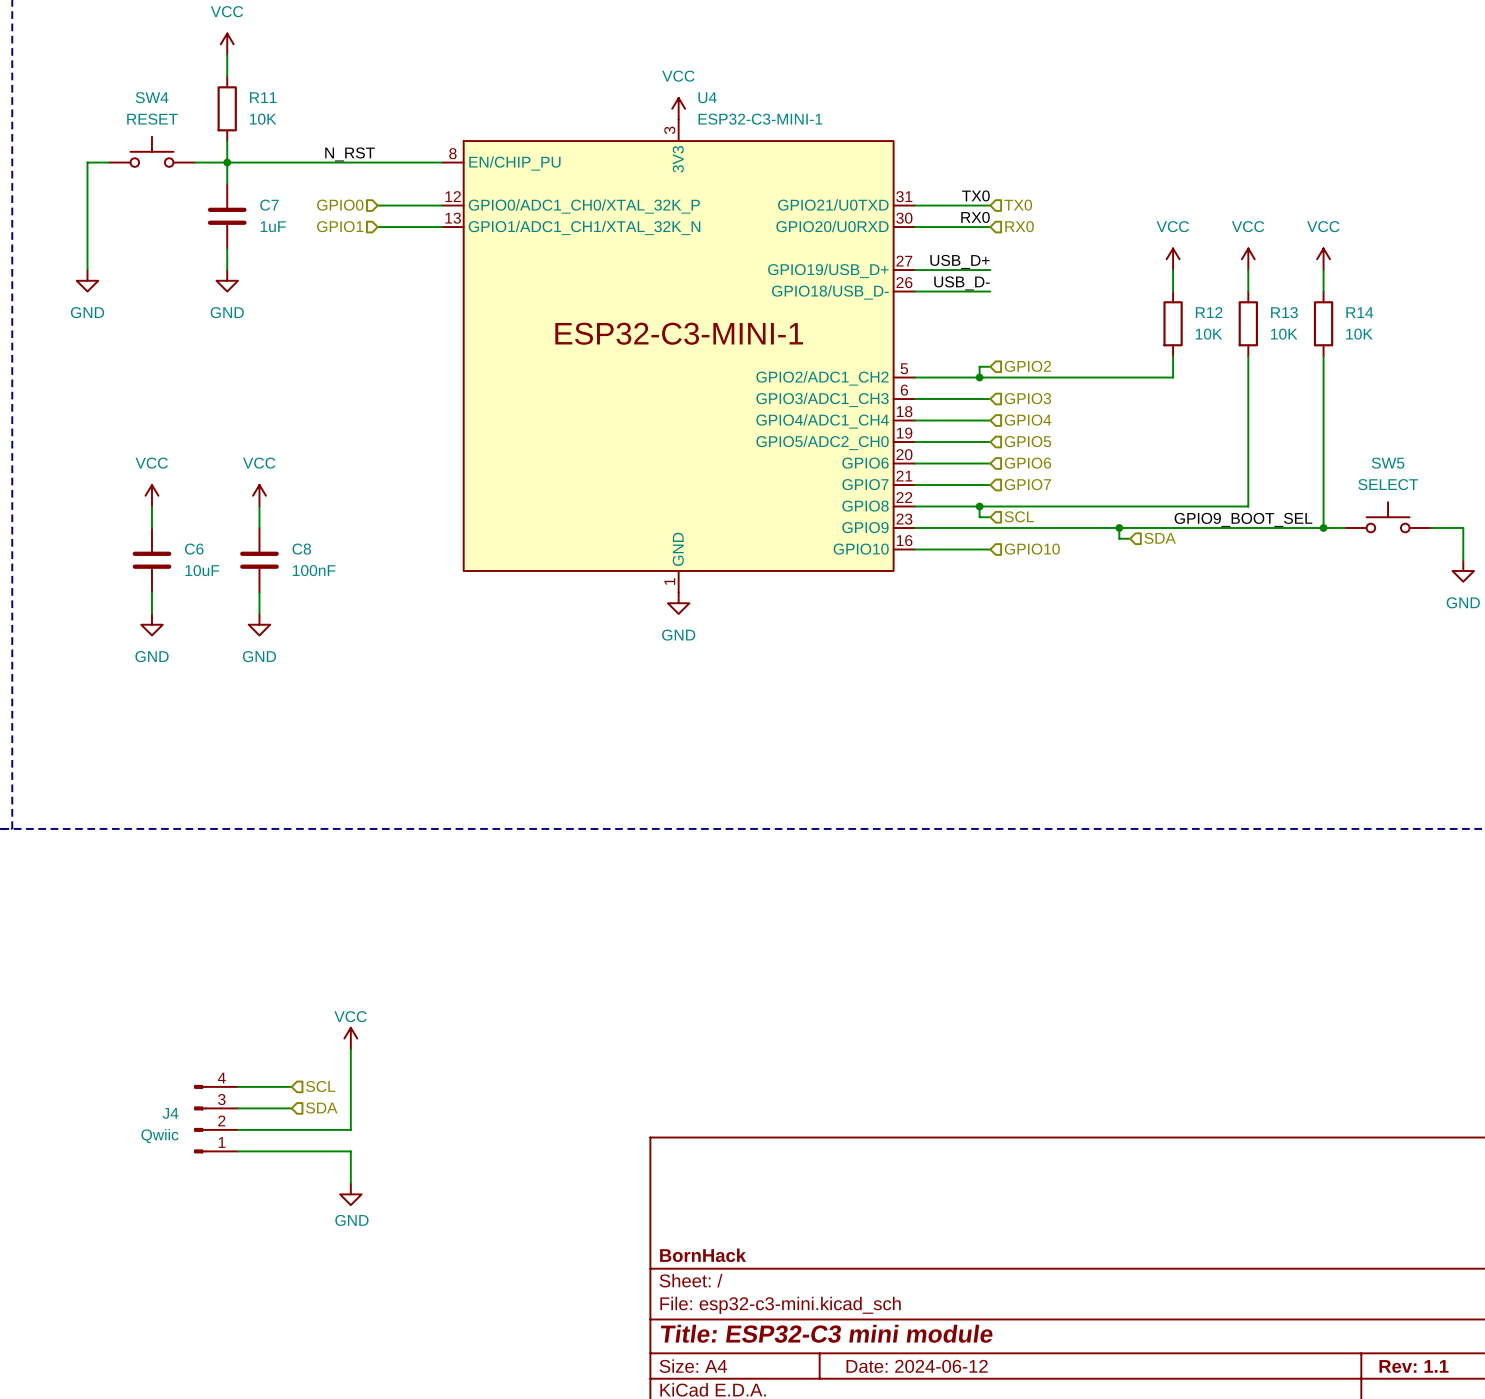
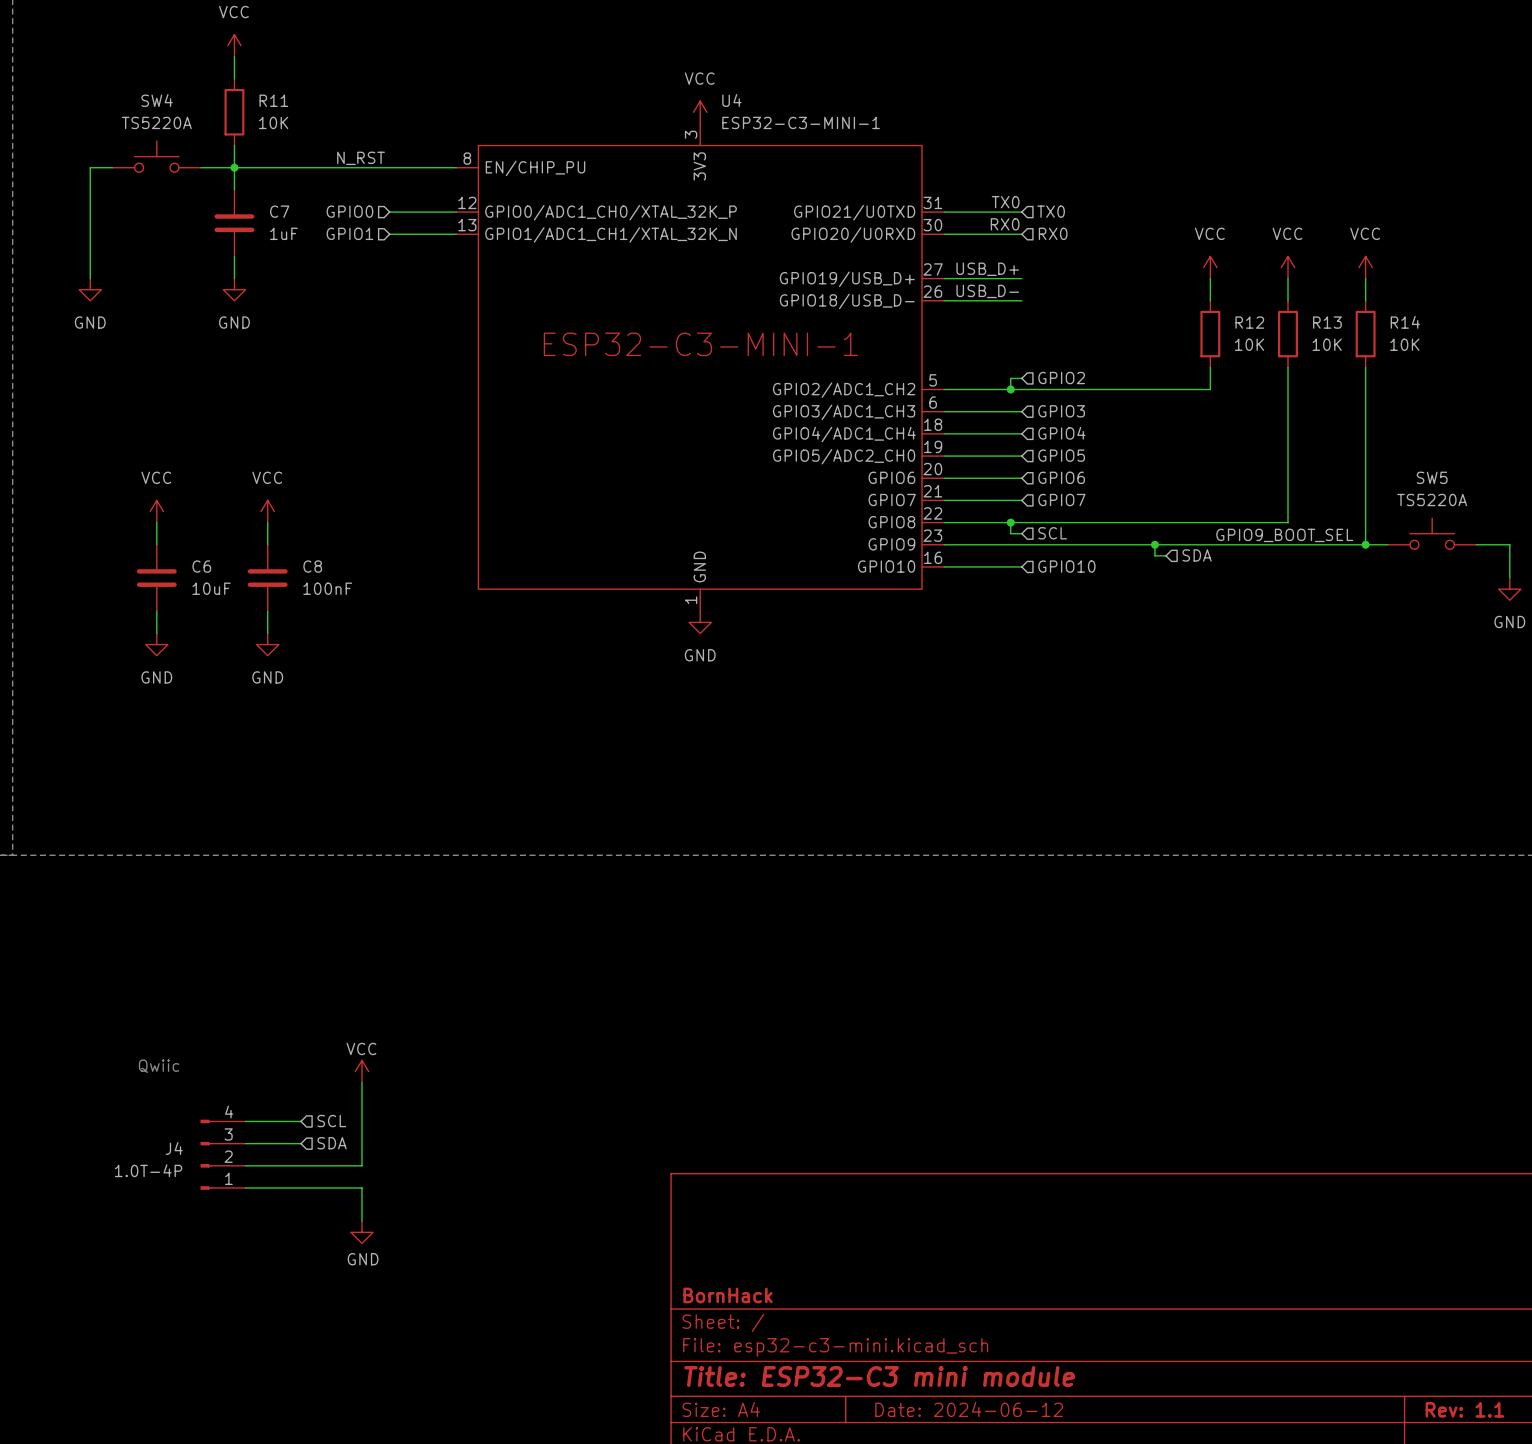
SW4 value: RESET (152, 119) -> TS5220A (156, 122)
SW5 value: SELECT (1388, 484) -> TS5220A (1432, 500)
text: none -> Qwiic (159, 1066)
J4 value: Qwiic (159, 1136) -> 1.0T-4P (148, 1170)

